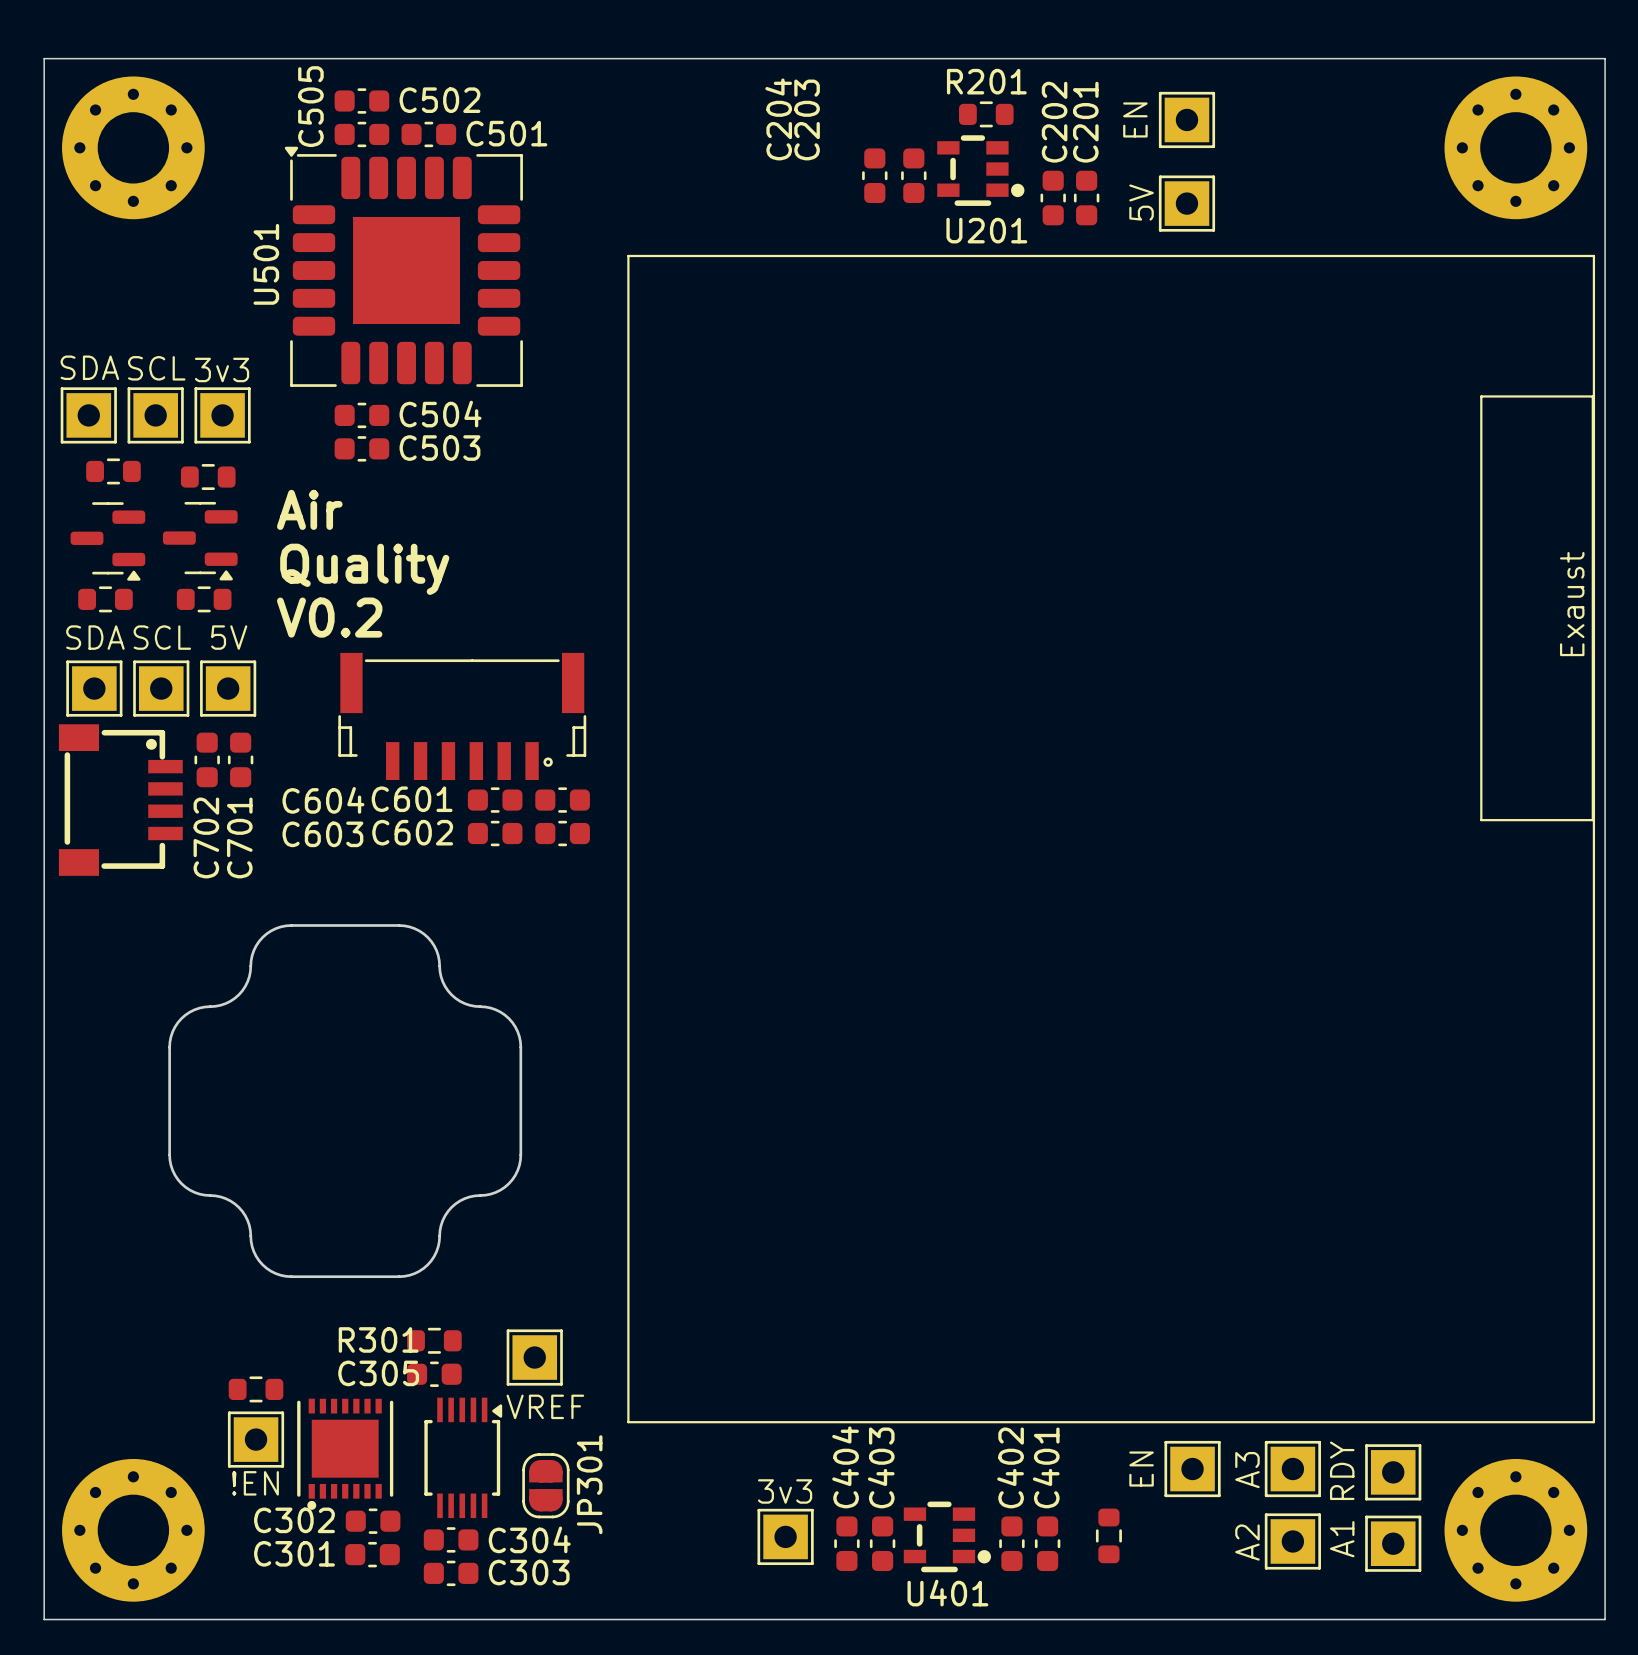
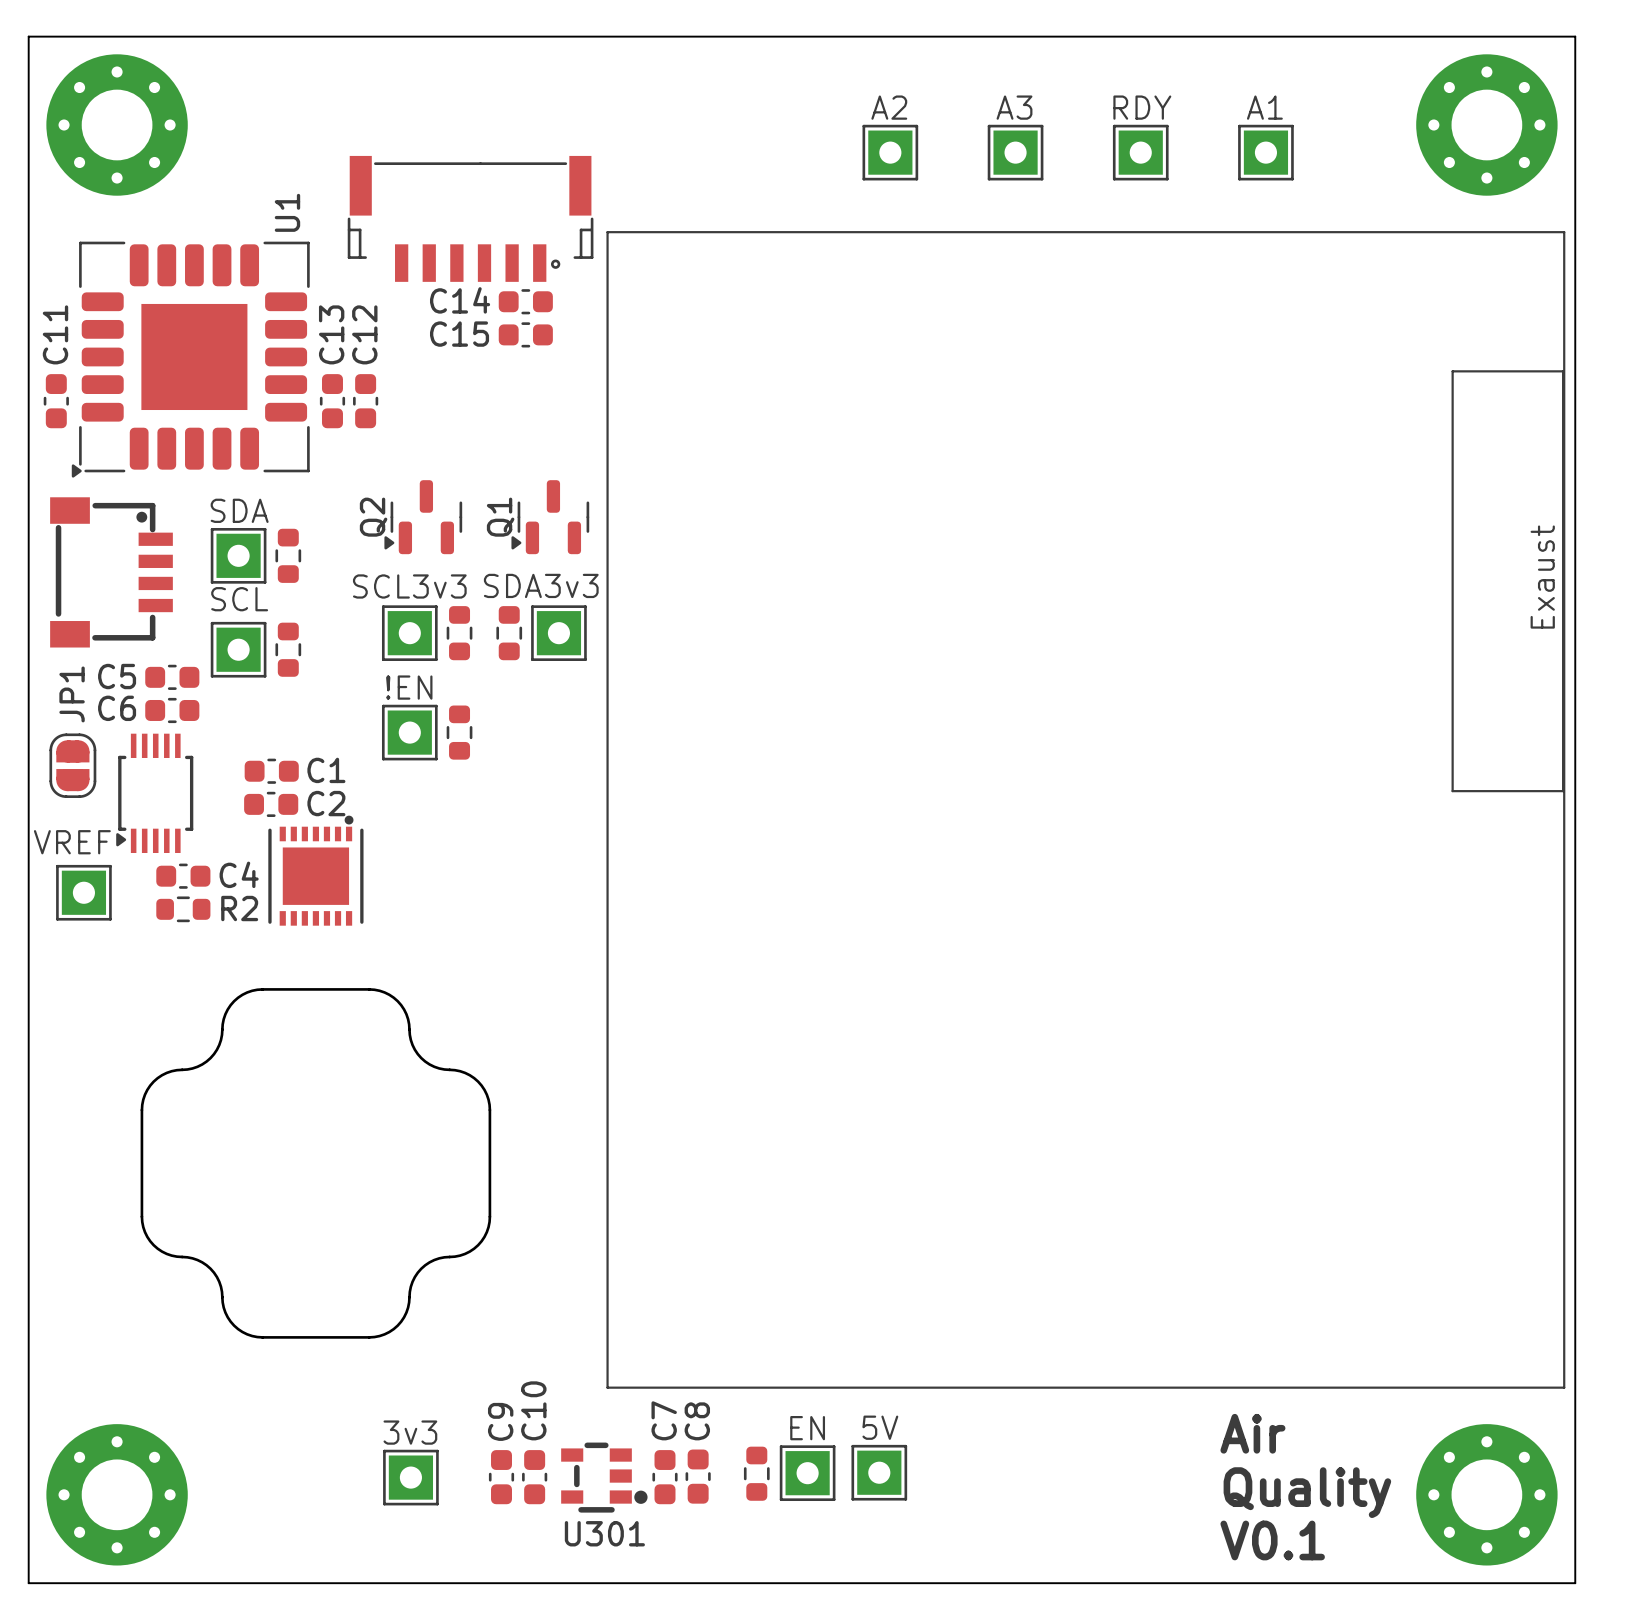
C502: (361, 101) -> none
R201: (986, 114) -> none
part: (1186, 119) -> none
C505: (361, 134) -> none
C501: (428, 134) -> none
U201: (980, 170) -> none
C204: (874, 175) -> none
C203: (913, 175) -> none
part: none -> (890, 152)
part: none -> (1015, 152)
part: none -> (1140, 152)
part: none -> (1265, 152)
C202: (1053, 198) -> none
C201: (1086, 198) -> none
part: (1186, 203) -> none
U501: (403, 266) -> none
C14: none -> (525, 301)
C15: none -> (525, 334)
U1: none -> (190, 359)
part: (88, 415) -> none
part: (155, 415) -> none
part: (222, 415) -> none
C504: (361, 415) -> none
C11: none -> (56, 401)
C13: none -> (332, 401)
C12: none -> (365, 401)
C503: (361, 448) -> none
part: (113, 471) -> none
part: (208, 477) -> none
text: Air (309, 509) -> none
part: (107, 541) -> none
part: (200, 541) -> none
Q2: none -> (423, 517)
Q1: none -> (550, 517)
text: Quality (364, 569) -> none
part: none -> (238, 555)
part: none -> (288, 555)
part footprint: [78, 586, 133, 613] -> [50, 497, 173, 648]
part: (204, 599) -> none
text: V0.2 (329, 617) -> none
part: none -> (409, 633)
part: none -> (459, 633)
part: none -> (509, 633)
part: none -> (558, 633)
part: none -> (288, 649)
part: (94, 688) -> none
part position: (161, 688) -> (238, 649)
part: (228, 688) -> none
C5: none -> (172, 677)
part position: (462, 716) -> (470, 218)
C6: none -> (172, 710)
C702: (207, 759) -> none
C701: (240, 759) -> none
part: none -> (409, 732)
part: none -> (459, 732)
JP1: none -> (72, 765)
part: (120, 800) -> none
C1: none -> (271, 771)
C604: (495, 800) -> none
C601: (562, 800) -> none
part: none -> (154, 793)
C2: none -> (271, 804)
C603: (495, 833) -> none
C602: (562, 833) -> none
C4: none -> (183, 876)
part: none -> (83, 892)
R2: none -> (183, 909)
part position: (345, 1101) -> (315, 1163)
R301: (434, 1340) -> none
part: (534, 1357) -> none
C305: (434, 1374) -> none
part: (256, 1389) -> none
part: (256, 1439) -> none
part rotation: 0° (345, 1454) -> 180° (315, 870)
part position: (345, 1454) -> (315, 870)
part: (463, 1457) -> none
text: none -> Air (1252, 1433)
part text rotation: 0° (1141, 1469) -> 90° clockwise (807, 1428)
part text position: EN (1141, 1469) -> EN (807, 1428)
part position: (1192, 1469) -> (807, 1473)
part: (1292, 1469) -> none
part: (1393, 1472) -> none
JP301: (545, 1485) -> none
part: none -> (879, 1472)
part: none -> (756, 1473)
C8: none -> (698, 1476)
C9: none -> (501, 1477)
C10: none -> (534, 1477)
U301: none -> (604, 1477)
C7: none -> (665, 1477)
C302: (373, 1521) -> none
text: none -> Quality (1307, 1492)
part: (1108, 1535) -> none
part position: (785, 1536) -> (410, 1477)
U401: (947, 1536) -> none
C304: (451, 1539) -> none
part: (1292, 1541) -> none
C404: (846, 1543) -> none
C403: (882, 1543) -> none
C402: (1011, 1543) -> none
C401: (1047, 1543) -> none
part: (1393, 1543) -> none
C301: (372, 1554) -> none
C303: (451, 1573) -> none
text: none -> V0.1 (1272, 1540)

